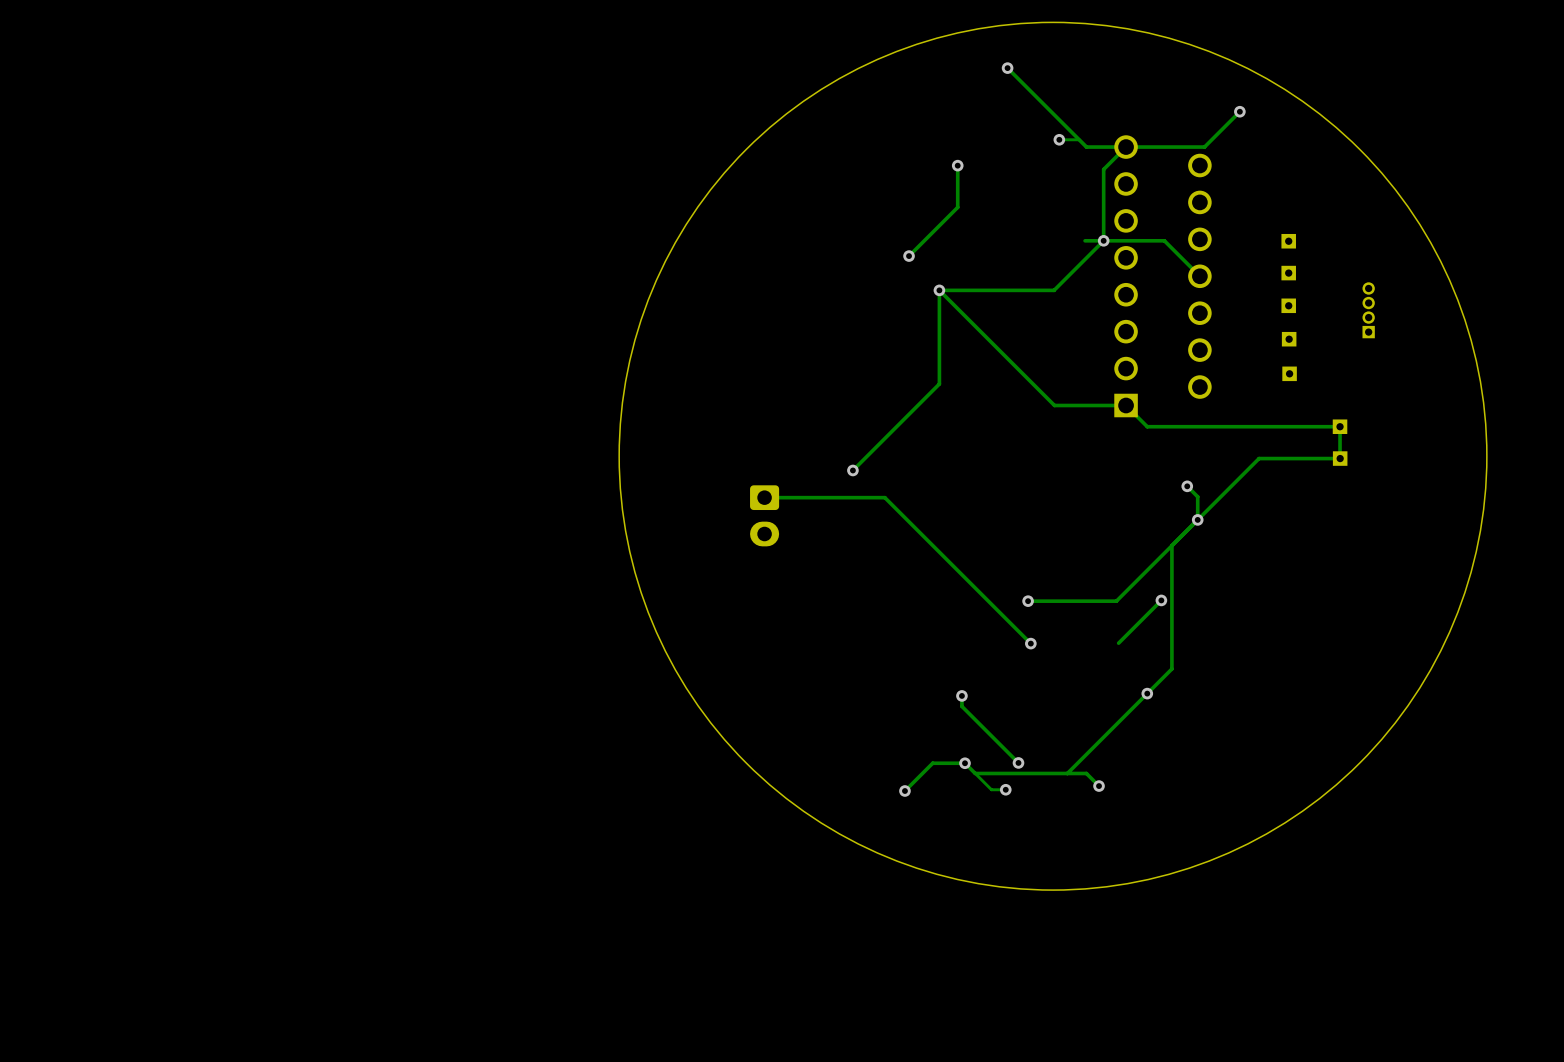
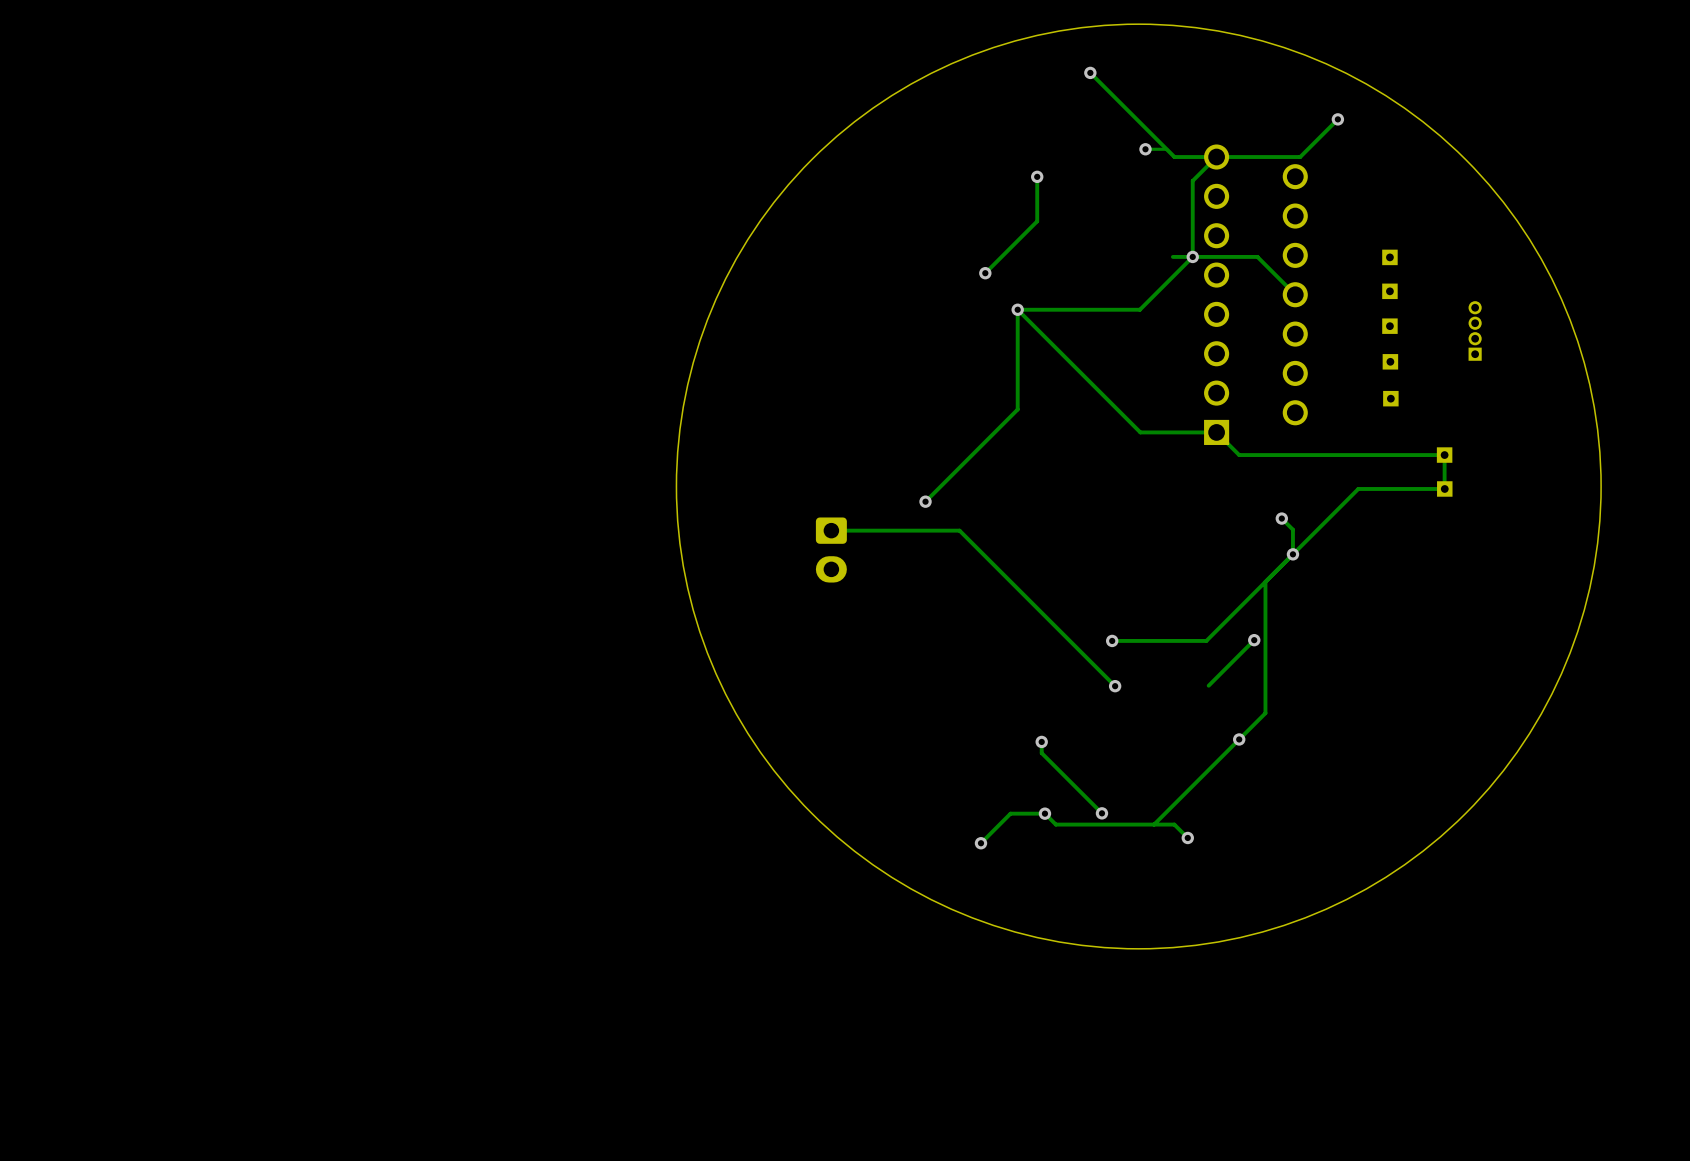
track: (975, 773) (991, 789) (1005, 789) -> none
via: (1005, 789) -> none

